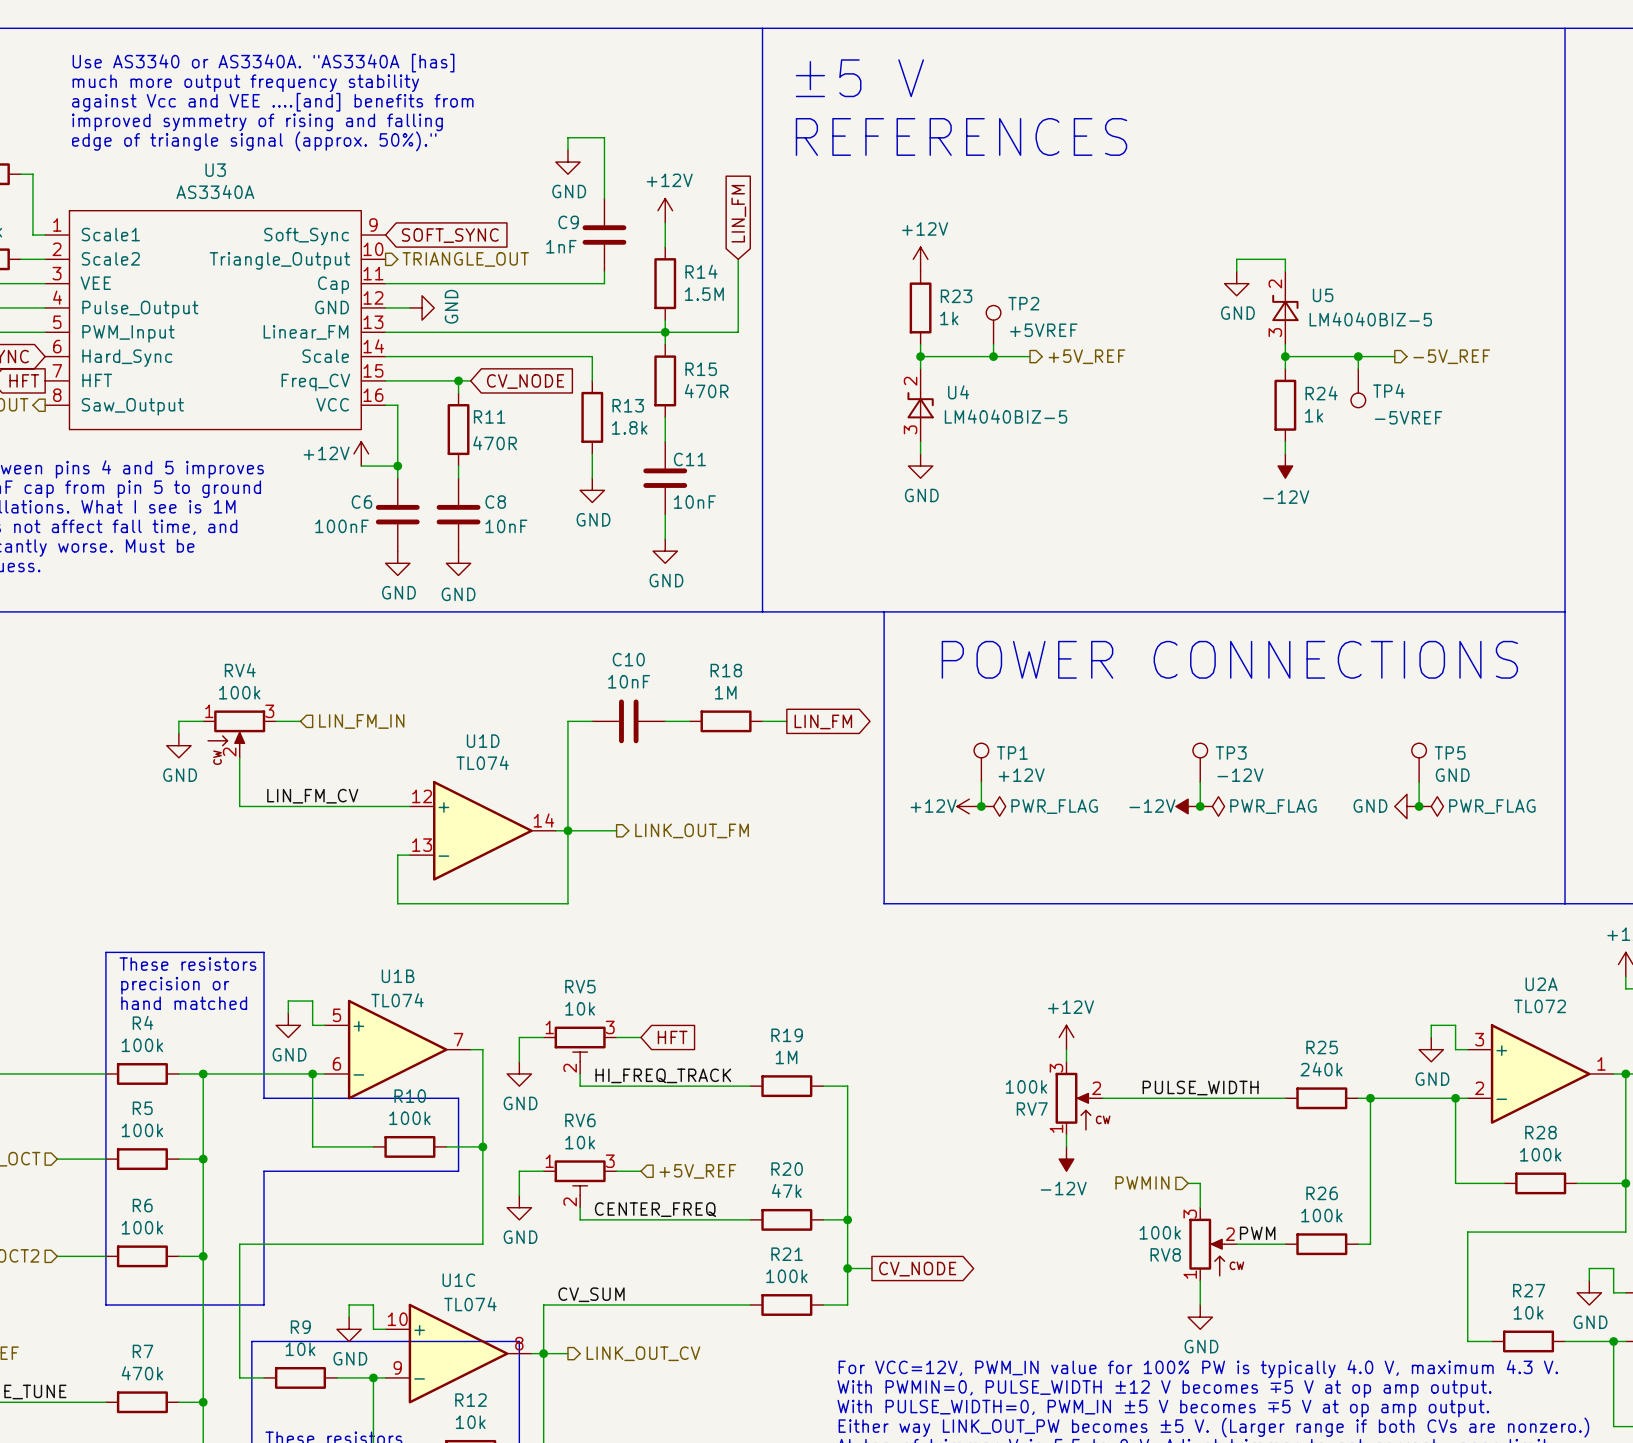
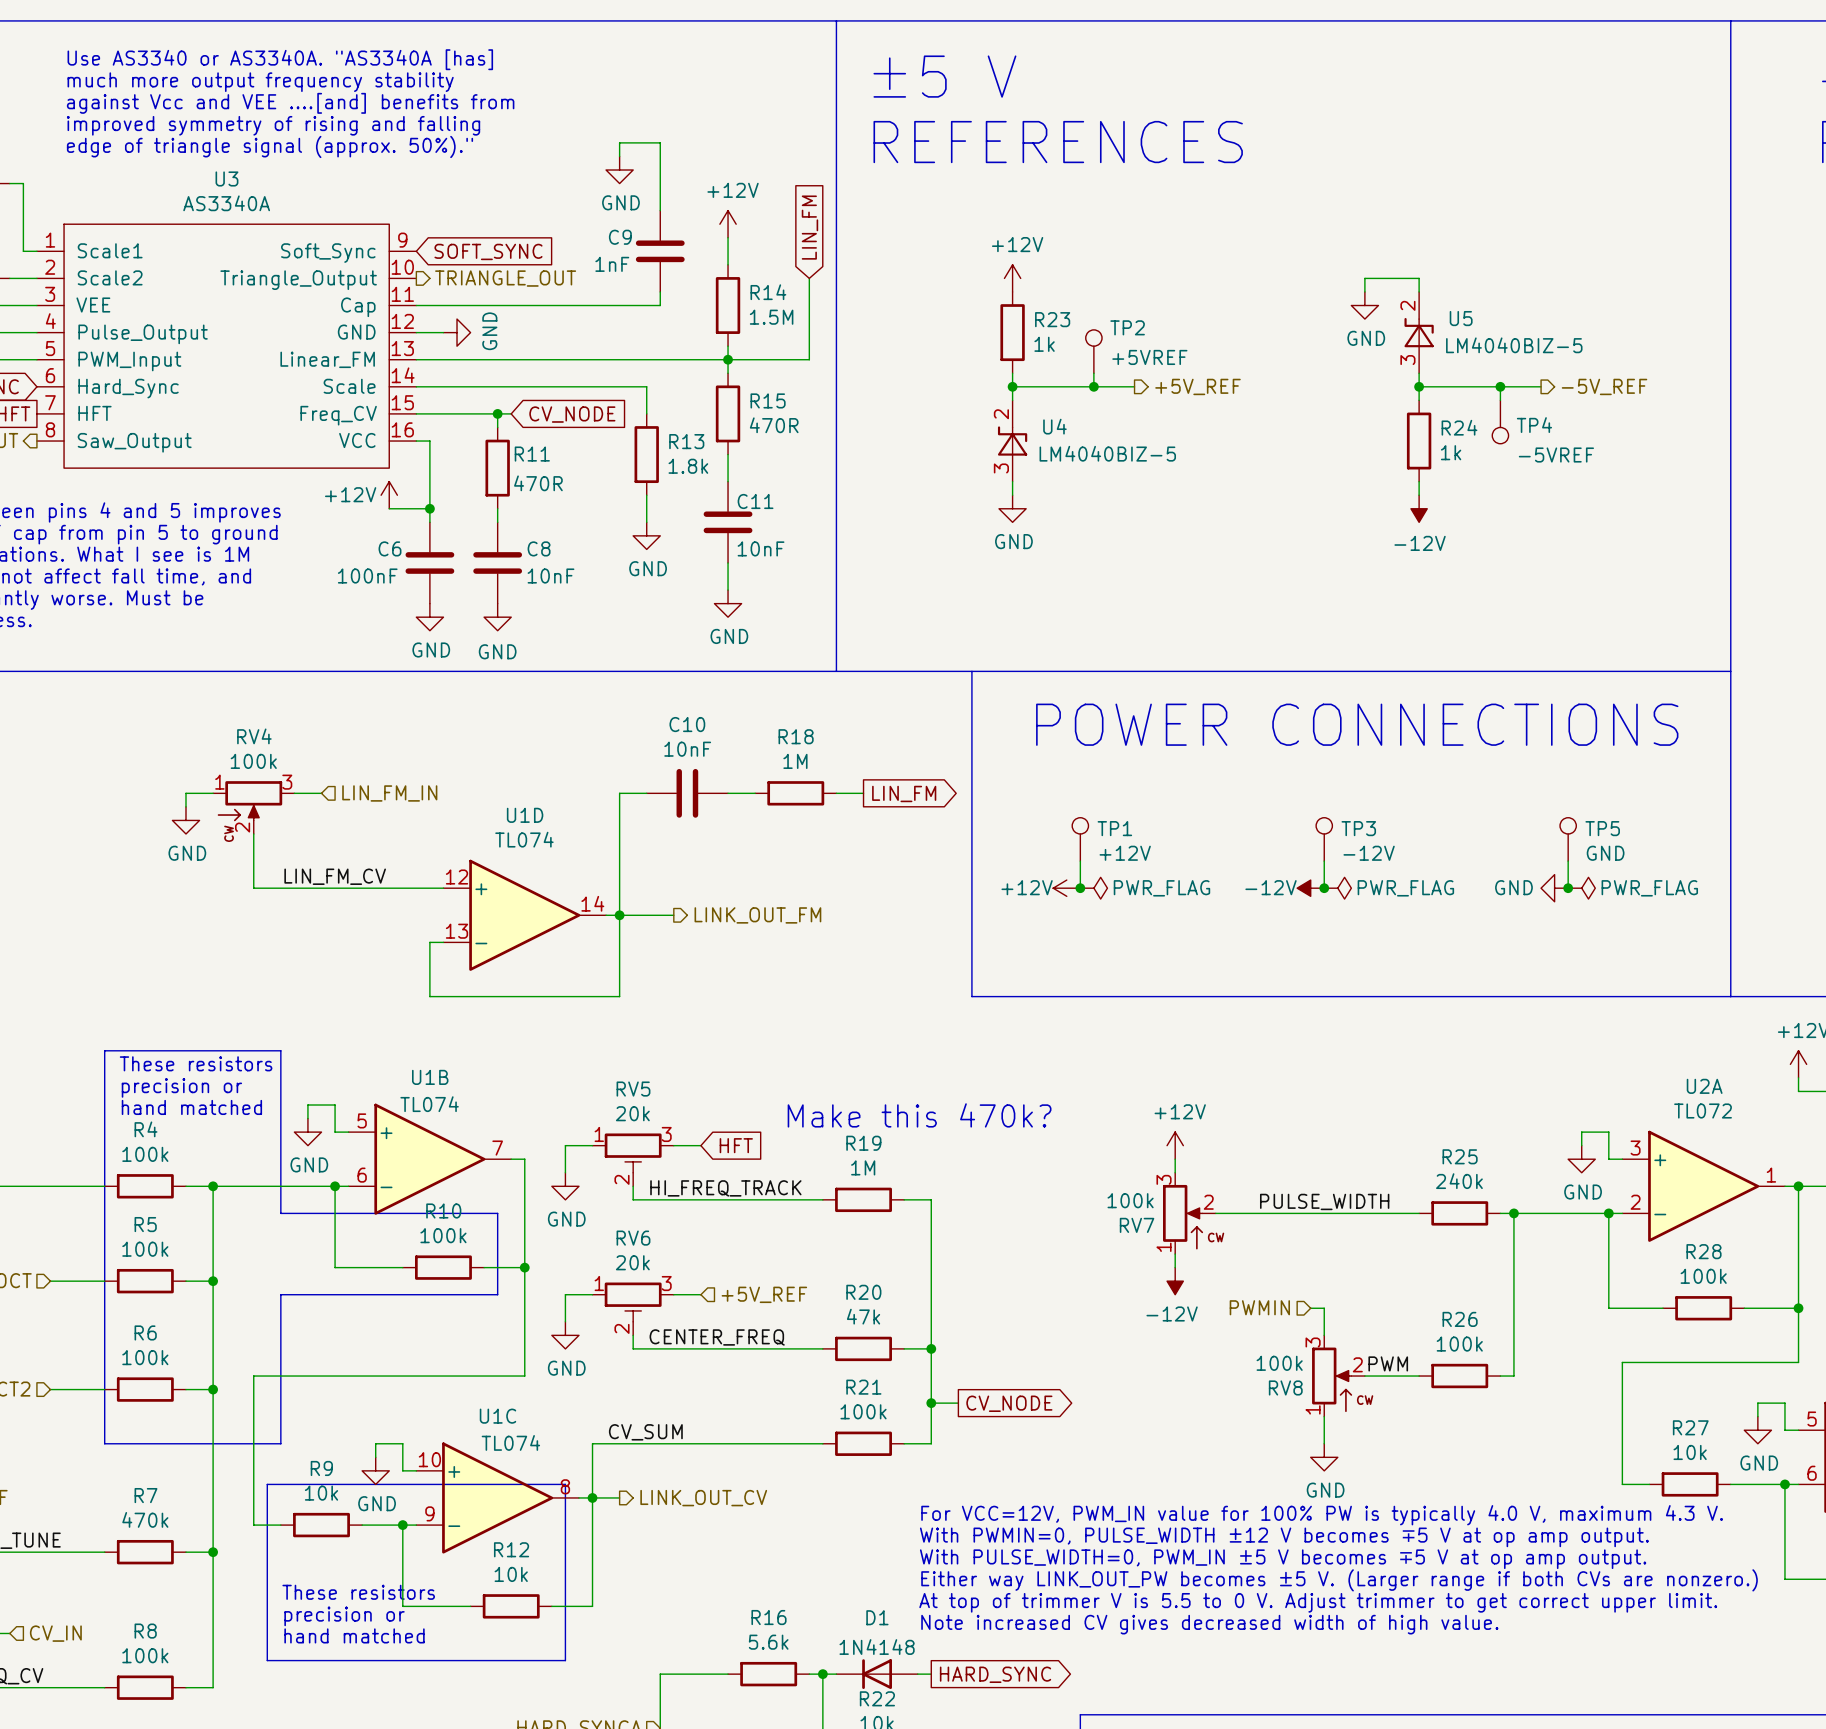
RV5 value: 10k (580, 1008) -> 20k (632, 1113)
text: none -> Make this 470k? (919, 1115)
RV6 value: 10k (580, 1142) -> 20k (632, 1262)

